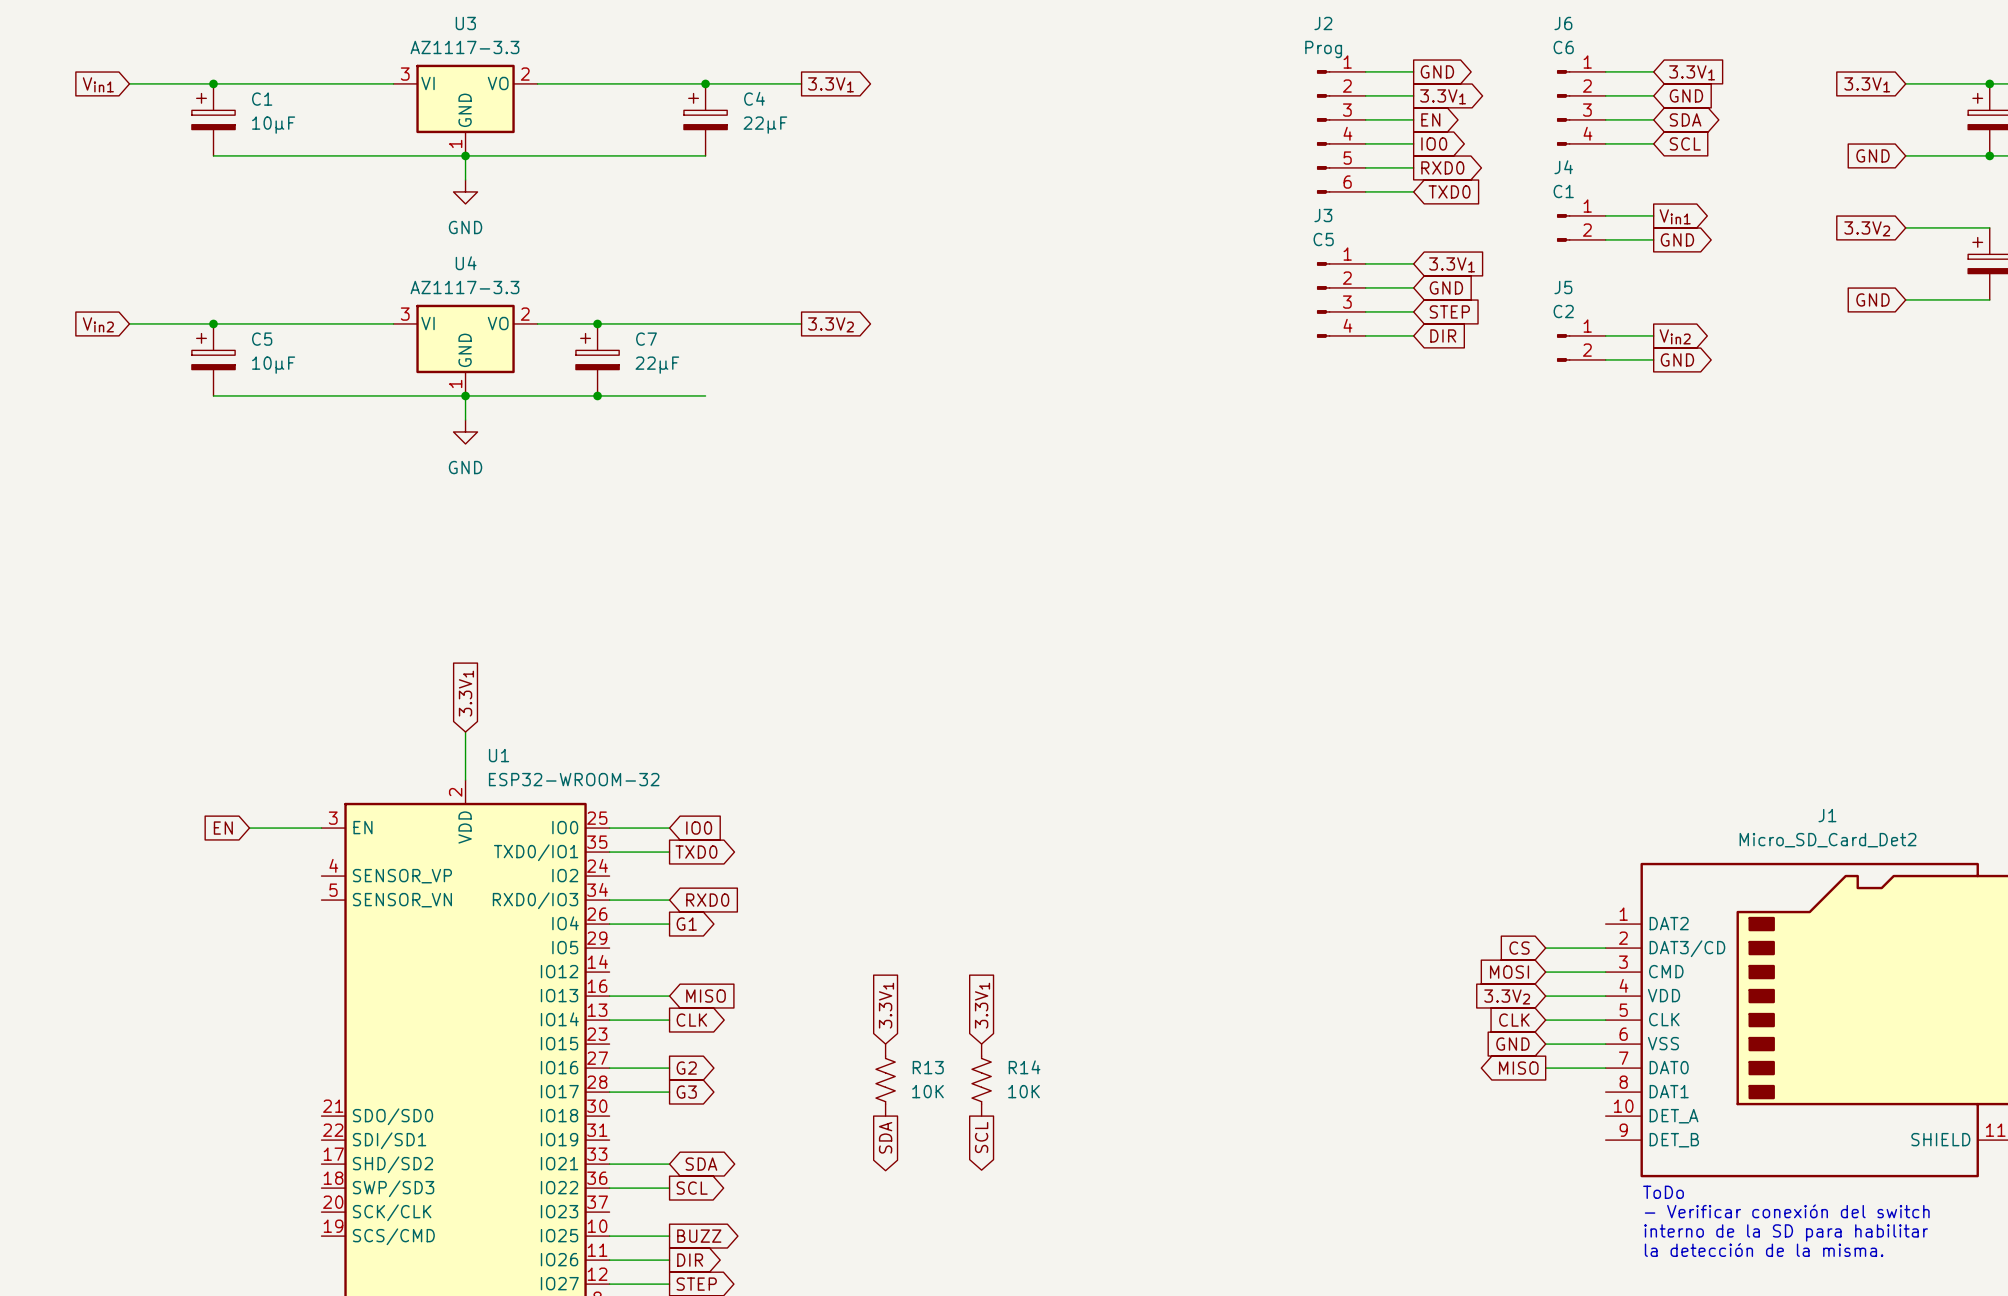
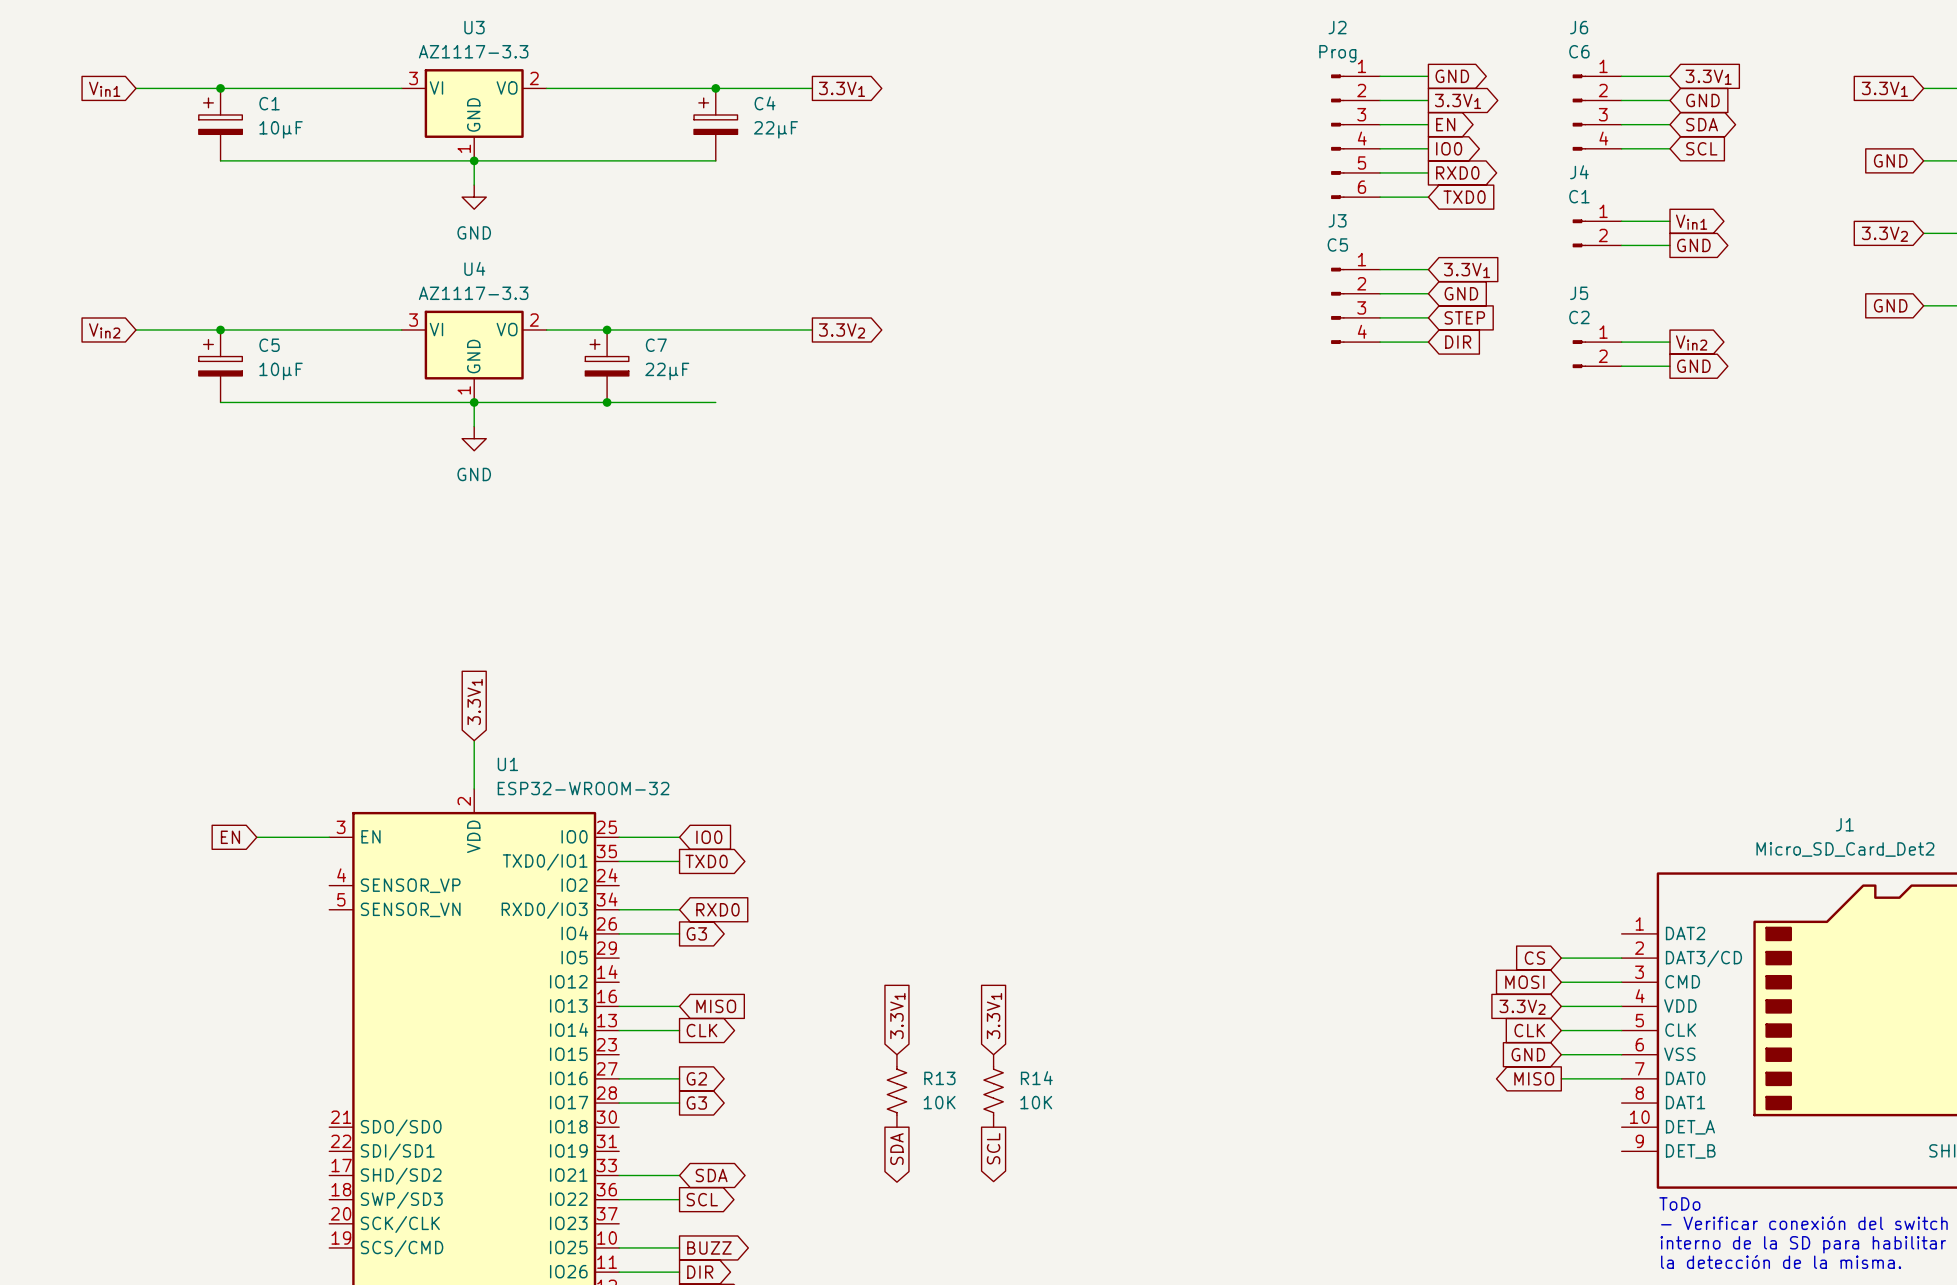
global label: G1 (686, 924) -> G3 (696, 933)

